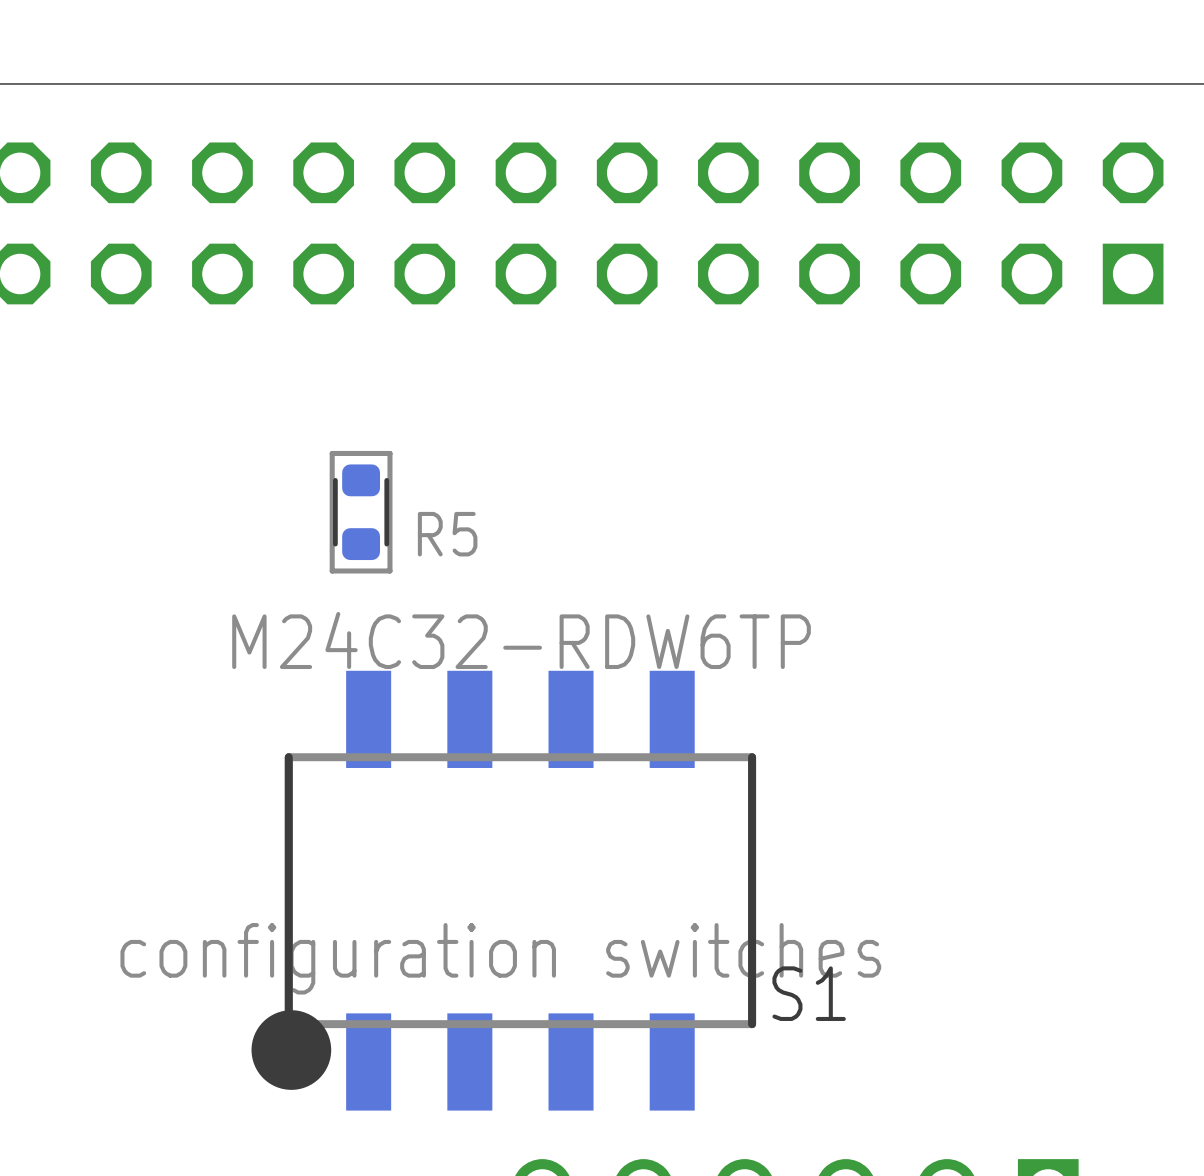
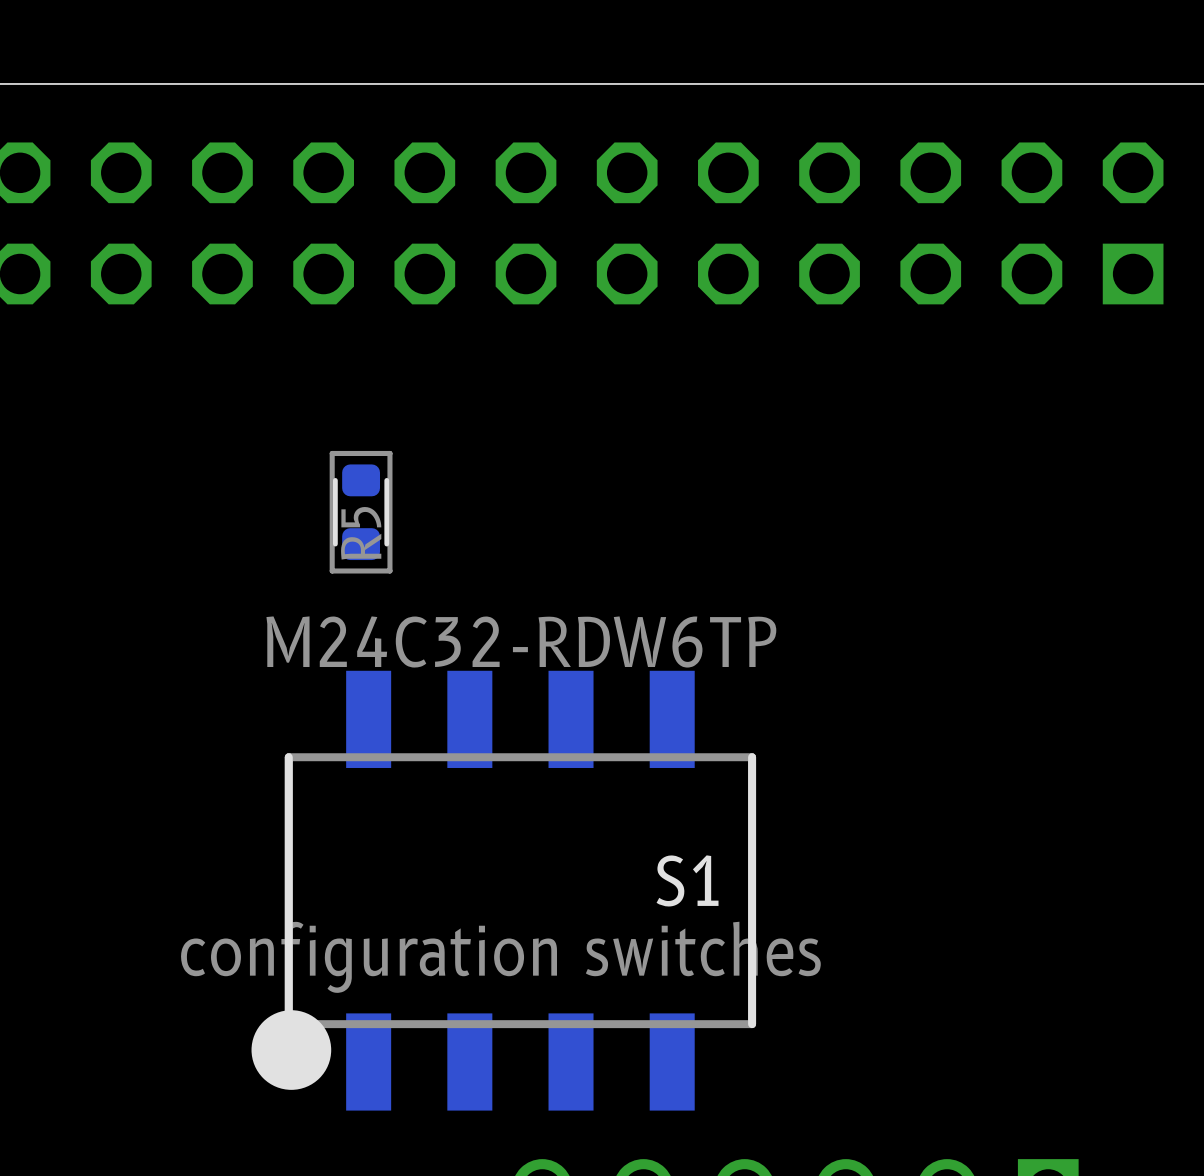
R5 name rotation: 0° (447, 534) -> 90° counterclockwise (361, 533)
S1 name position: S1 (809, 993) -> S1 (687, 880)

